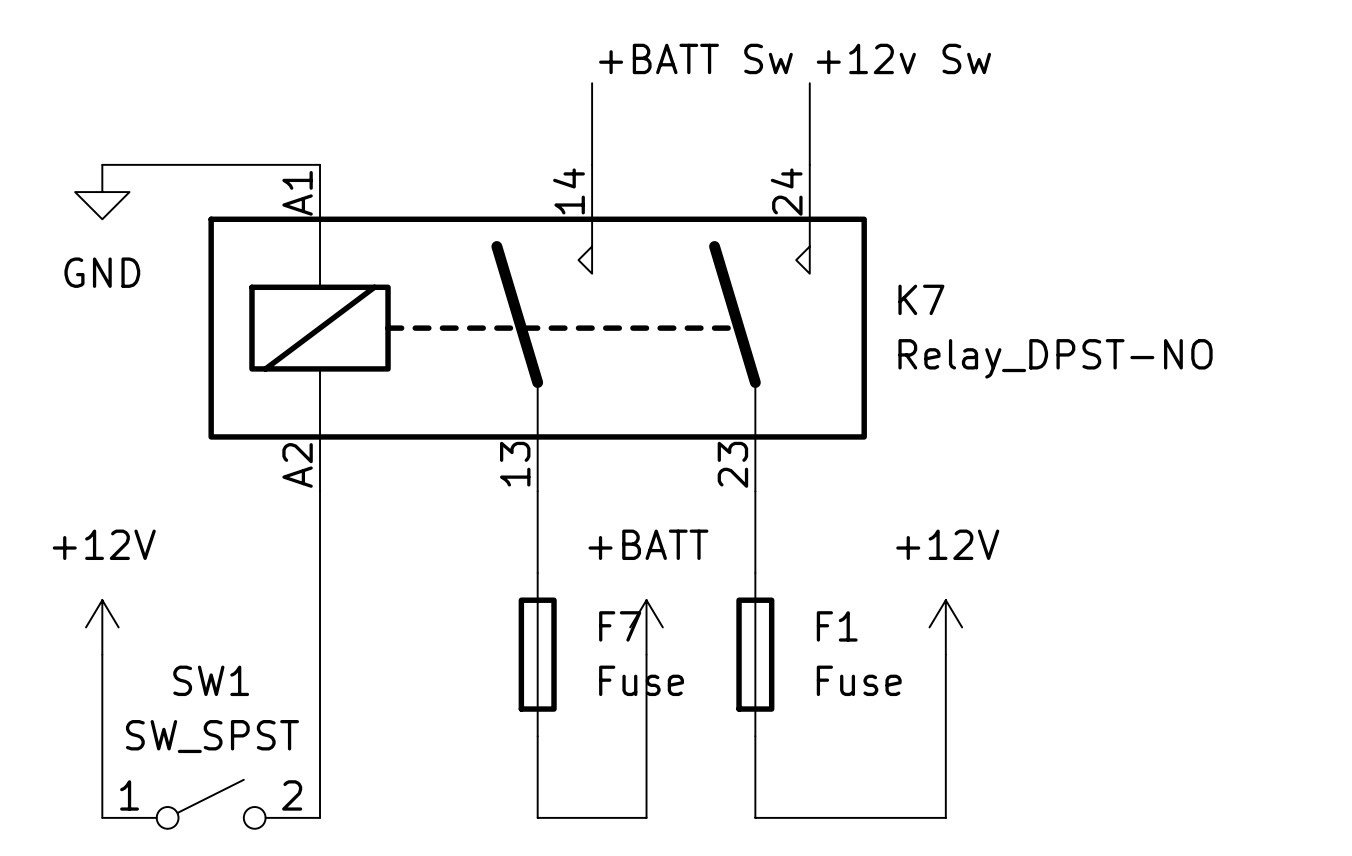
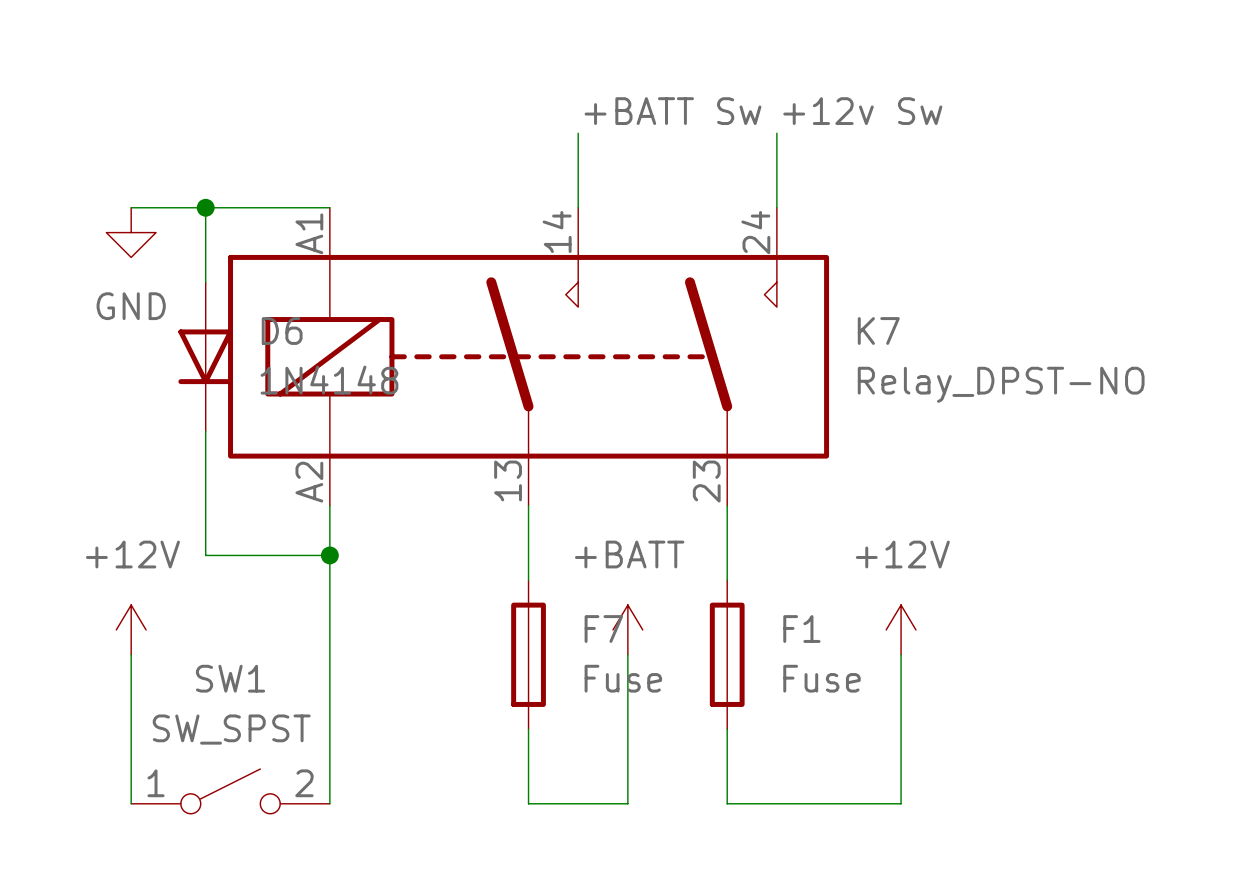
wire: none -> (205, 207) (205, 282)
junction: none -> (205, 207)
D6: none -> 1N4148 (205, 356)
wire: none -> (205, 431) (205, 555) (329, 555)
junction: none -> (329, 555)

